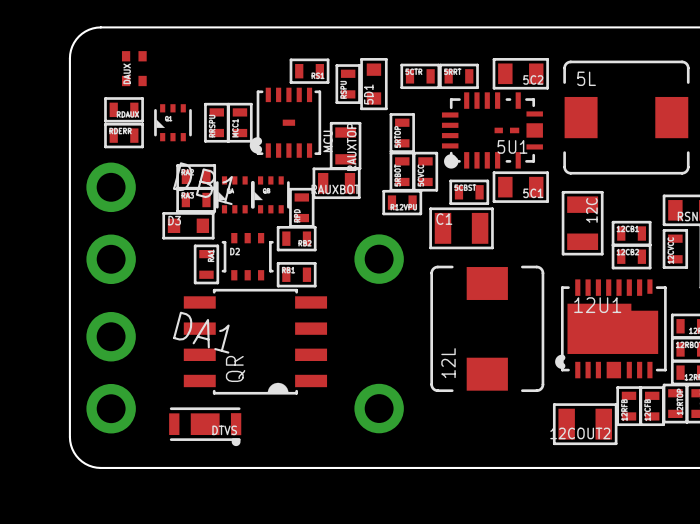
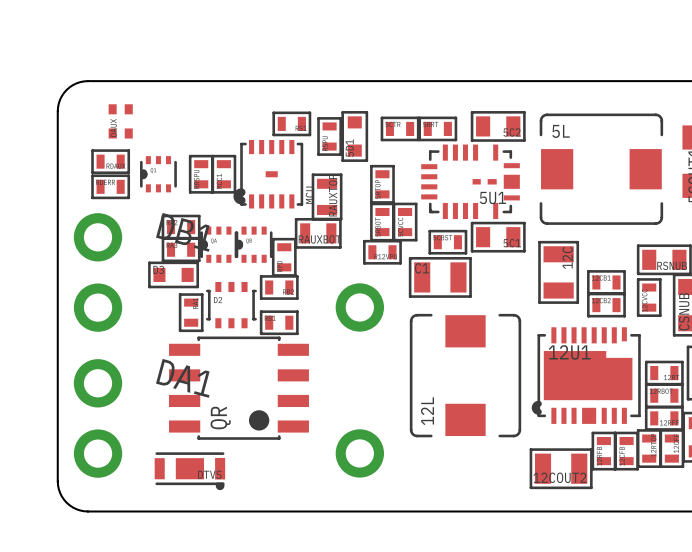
5U1 footprint: [441, 92, 543, 169] -> [421, 144, 520, 220]
part footprint: [154, 104, 192, 142] -> [140, 156, 177, 193]
part footprint: [215, 176, 254, 214] -> [200, 226, 238, 263]
part footprint: [252, 176, 290, 214] -> [235, 226, 273, 263]
QR footprint: [183, 288, 328, 395] -> [169, 336, 309, 440]

